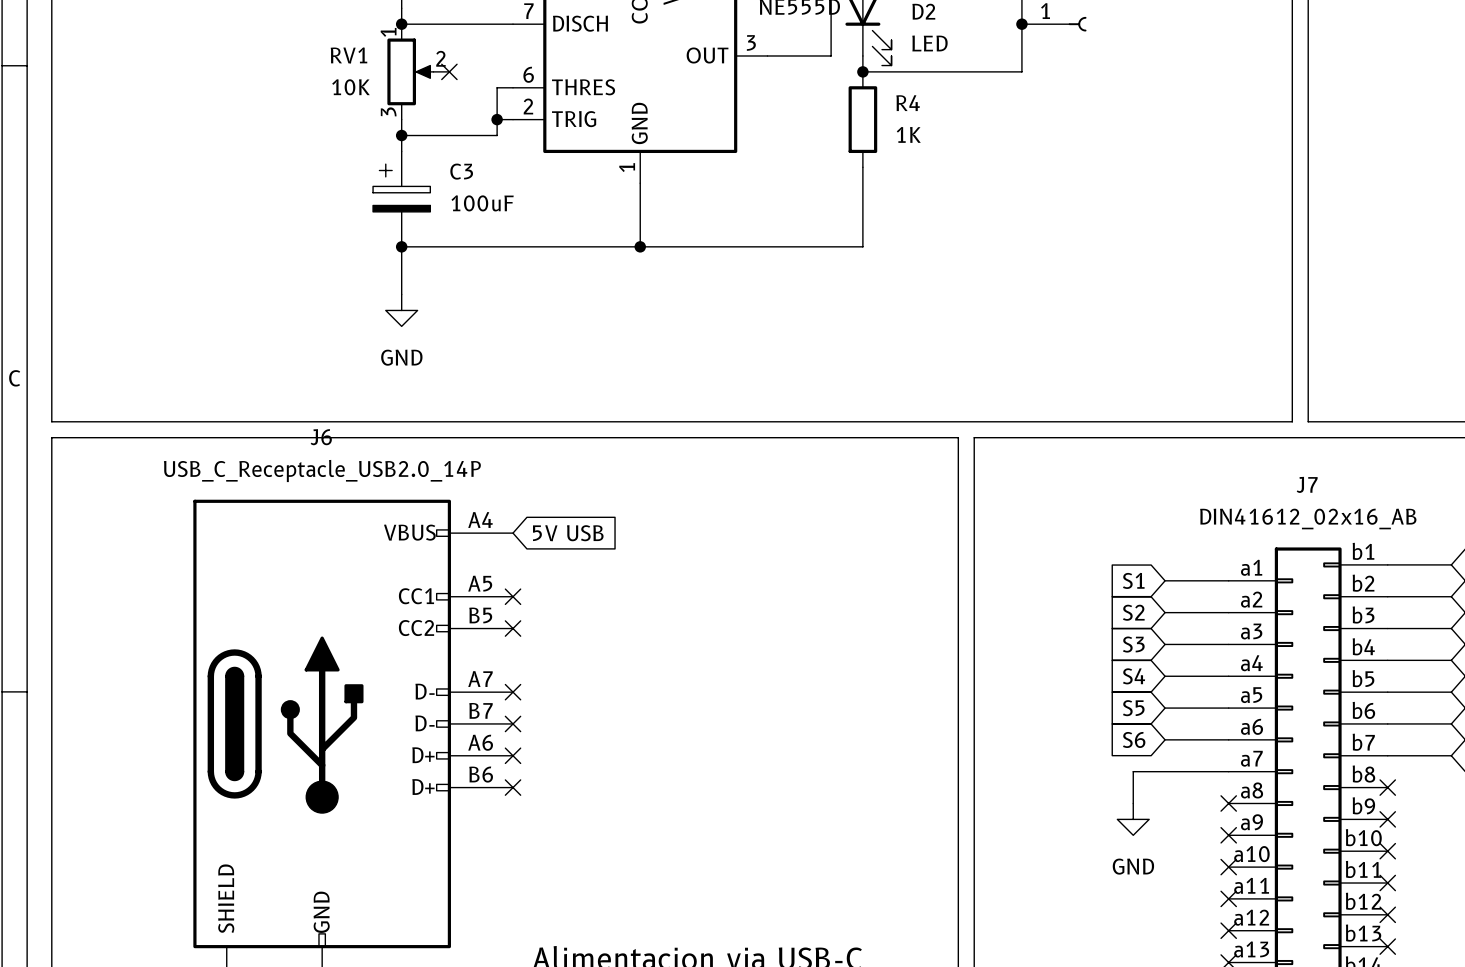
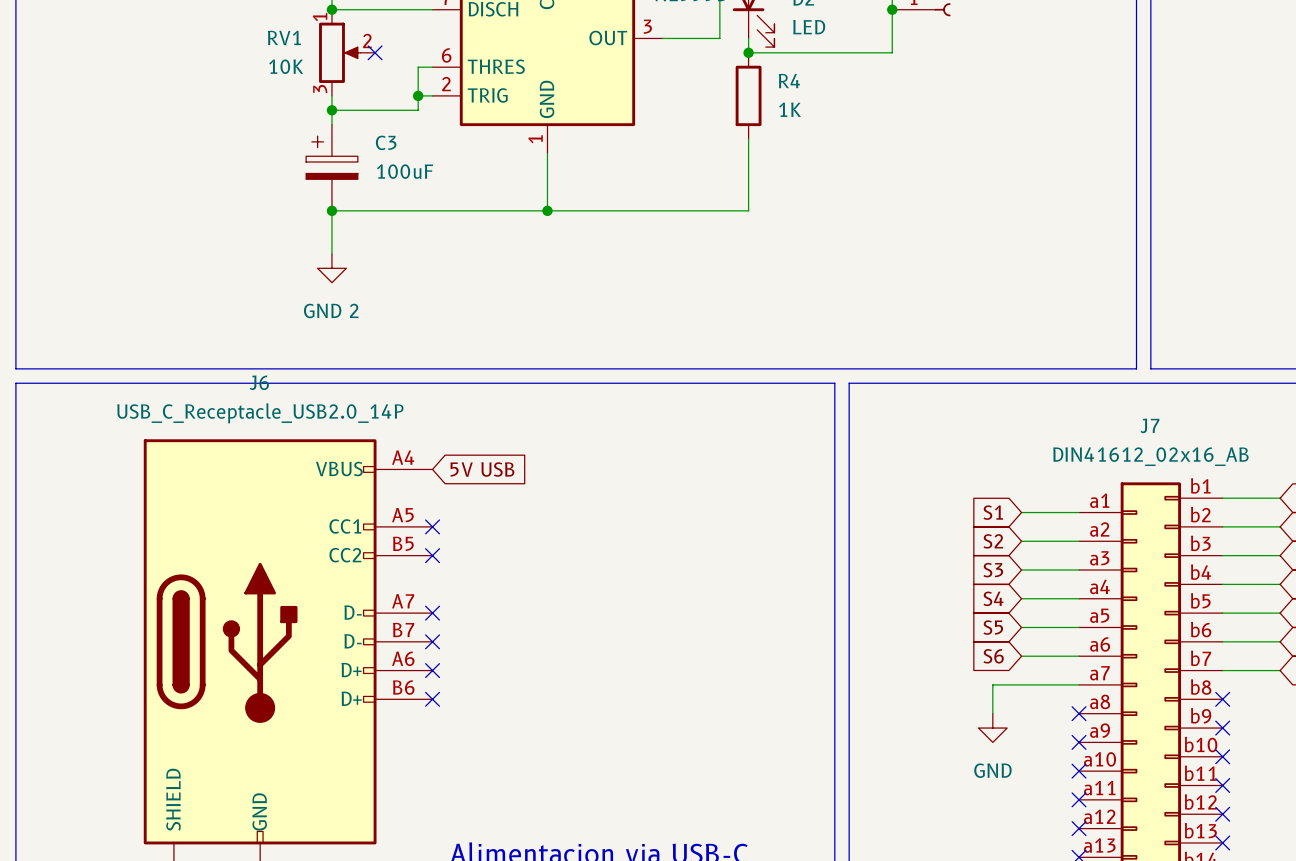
power symbol: GND (401, 310) -> GND 2 (331, 268)

